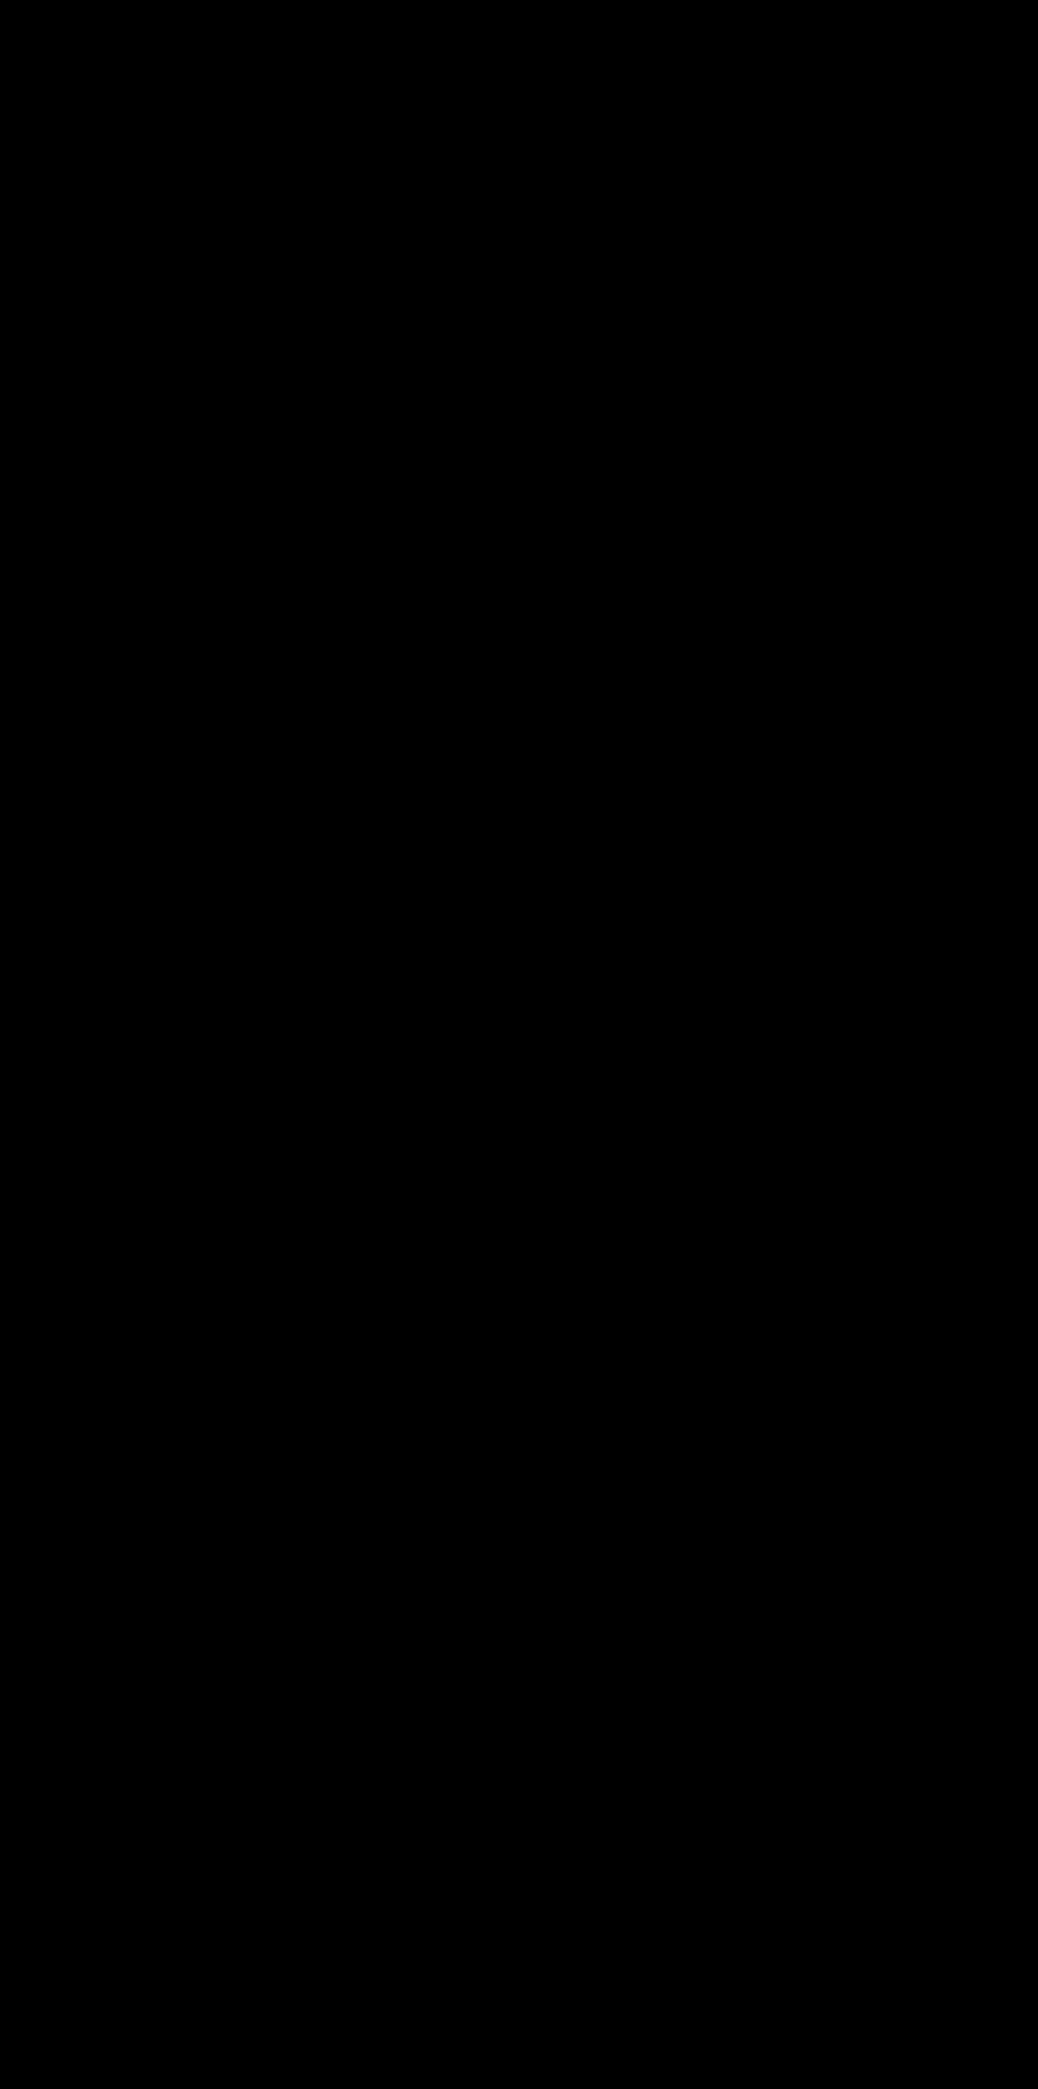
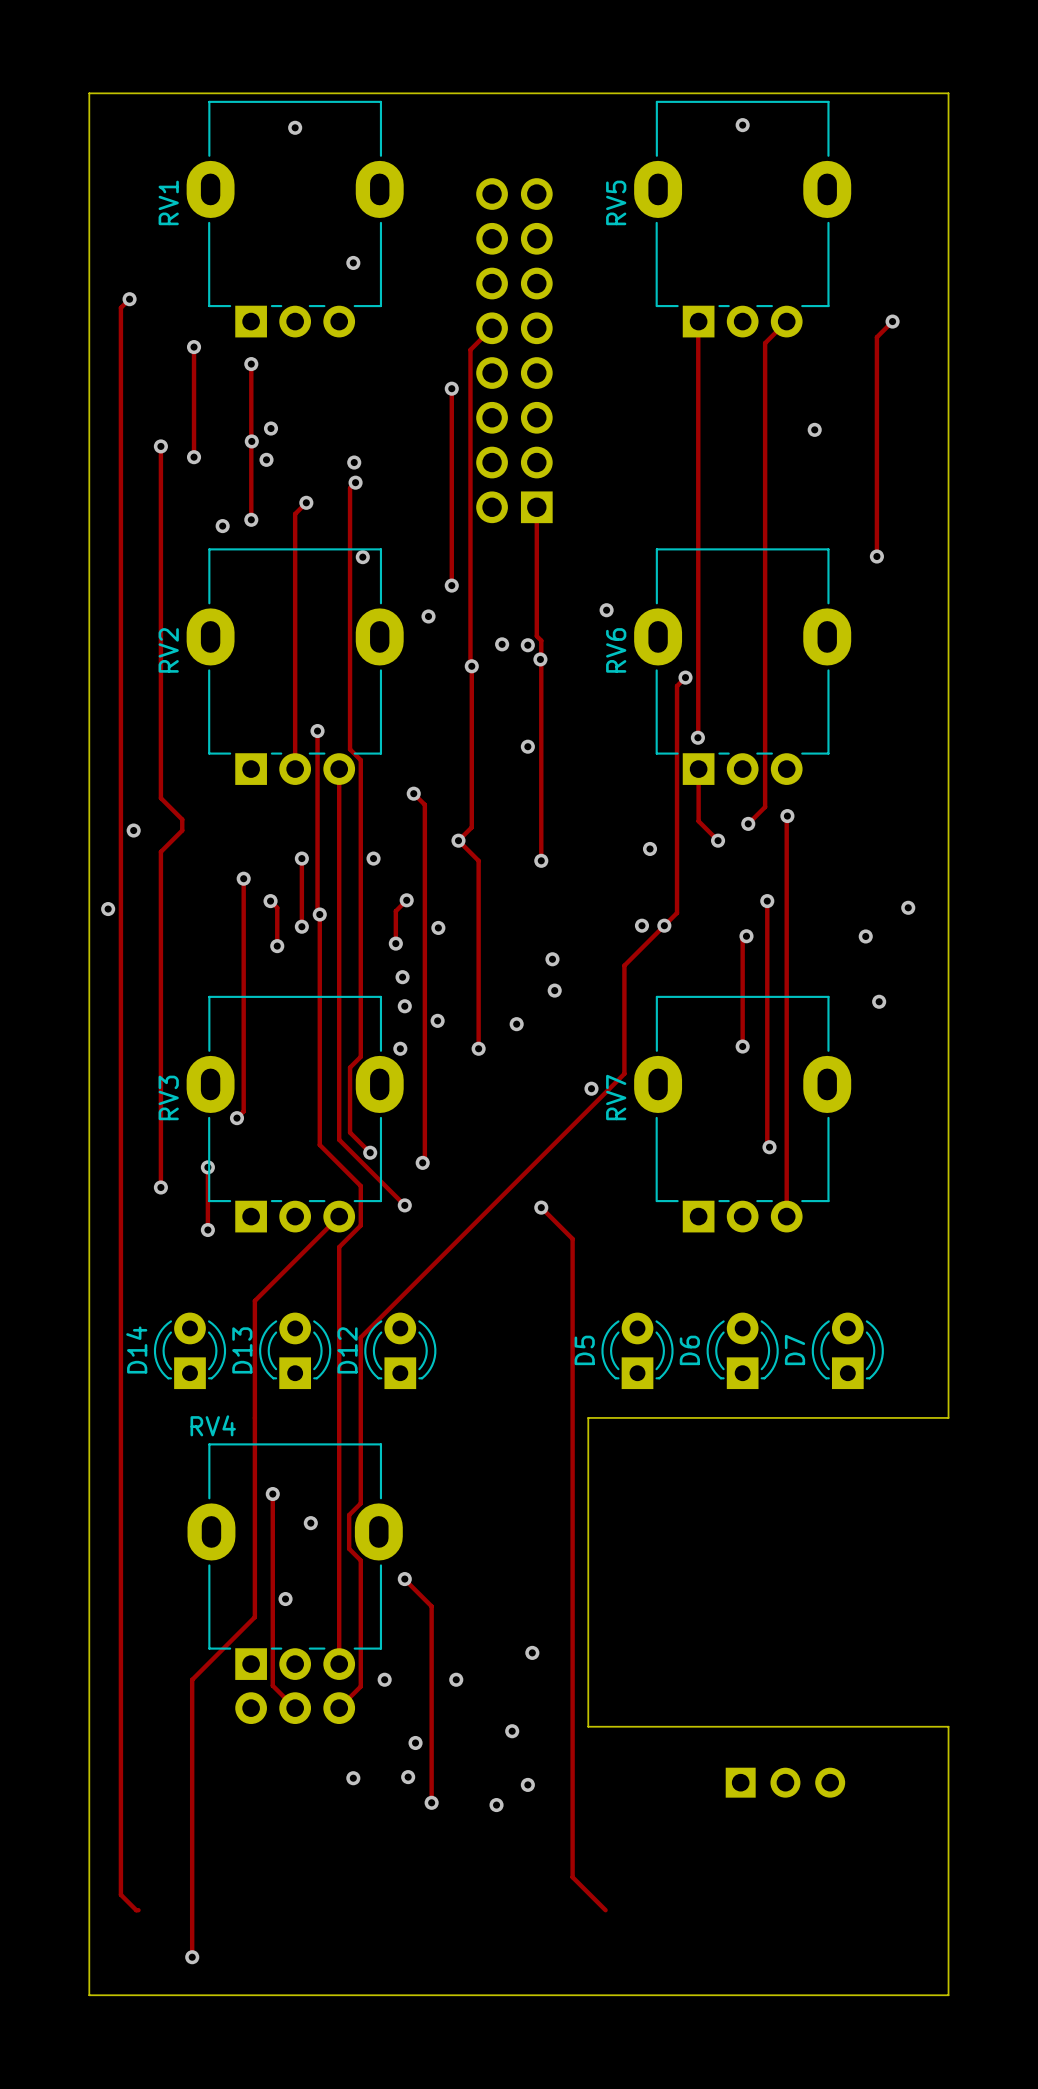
board edge: none -> (89, 93) (89, 1995) (948, 1995) (948, 1726) (588, 1726) (588, 1417) (948, 1417) (948, 93) (89, 93)
via: none -> (742, 125)
via: none -> (295, 127)
RV1: none -> (295, 219)
RV5: none -> (742, 219)
via: none -> (353, 262)
track: none -> (129, 299) (120, 307) (120, 1894) (138, 1910)
via: none -> (129, 299)
track: none -> (698, 321) (697, 737)
track: none -> (786, 321) (765, 343) (765, 807) (748, 823)
track: none -> (892, 321) (876, 337) (876, 556)
via: none -> (892, 321)
track: none -> (492, 328) (470, 349) (471, 827) (458, 840) (478, 860) (478, 1048)
track: none -> (194, 347) (194, 457)
via: none -> (194, 347)
part: none -> (514, 350)
track: none -> (251, 364) (251, 519)
via: none -> (251, 364)
track: none -> (451, 388) (451, 585)
via: none -> (451, 388)
via: none -> (270, 428)
via: none -> (814, 429)
via: none -> (251, 441)
track: none -> (160, 446) (160, 798) (182, 819) (182, 830) (160, 851) (160, 1187)
via: none -> (160, 446)
via: none -> (194, 457)
via: none -> (266, 459)
via: none -> (354, 462)
track: none -> (355, 482) (350, 488) (350, 749) (360, 760) (360, 1056) (350, 1067) (350, 1132) (370, 1152)
via: none -> (355, 482)
track: none -> (306, 502) (295, 514) (295, 769)
via: none -> (306, 502)
track: none -> (536, 507) (536, 636) (541, 640) (541, 860)
via: none -> (251, 519)
via: none -> (222, 526)
via: none -> (876, 556)
via: none -> (362, 557)
via: none -> (451, 585)
via: none -> (606, 610)
via: none -> (428, 616)
via: none -> (502, 644)
via: none -> (527, 645)
via: none -> (540, 659)
RV2: none -> (295, 666)
via: none -> (471, 666)
RV6: none -> (742, 666)
track: none -> (685, 677) (677, 686) (677, 913) (624, 965) (624, 1073) (360, 1337) (360, 1503) (349, 1515) (349, 1548) (360, 1560) (360, 1686) (339, 1708)
via: none -> (685, 677)
track: none -> (317, 731) (319, 1144) (360, 1186) (360, 1225) (339, 1247) (339, 1664)
via: none -> (317, 731)
via: none -> (697, 737)
via: none -> (527, 746)
track: none -> (339, 769) (339, 1139) (404, 1205)
track: none -> (698, 769) (698, 821) (718, 840)
track: none -> (413, 793) (424, 804) (424, 1160) (422, 1162)
via: none -> (413, 793)
track: none -> (787, 816) (786, 1216)
via: none -> (787, 816)
via: none -> (748, 823)
via: none -> (133, 830)
via: none -> (458, 840)
via: none -> (718, 840)
via: none -> (650, 848)
track: none -> (301, 858) (301, 926)
via: none -> (301, 858)
via: none -> (373, 858)
via: none -> (541, 860)
track: none -> (243, 878) (243, 1111) (236, 1118)
via: none -> (243, 878)
track: none -> (406, 900) (395, 911) (395, 943)
via: none -> (406, 900)
track: none -> (270, 901) (277, 907) (277, 946)
via: none -> (270, 901)
track: none -> (767, 901) (767, 1144) (769, 1147)
via: none -> (767, 901)
via: none -> (908, 907)
via: none -> (108, 909)
via: none -> (319, 914)
via: none -> (641, 925)
via: none -> (664, 925)
via: none -> (301, 926)
via: none -> (438, 927)
track: none -> (746, 936) (742, 940) (742, 1046)
via: none -> (746, 936)
via: none -> (865, 936)
via: none -> (395, 943)
via: none -> (277, 946)
via: none -> (552, 959)
via: none -> (402, 977)
via: none -> (554, 990)
via: none -> (879, 1001)
via: none -> (404, 1006)
via: none -> (437, 1020)
via: none -> (516, 1024)
via: none -> (742, 1046)
via: none -> (400, 1048)
via: none -> (478, 1048)
via: none -> (591, 1088)
RV3: none -> (295, 1114)
RV7: none -> (742, 1114)
via: none -> (236, 1118)
via: none -> (769, 1147)
via: none -> (370, 1152)
via: none -> (422, 1162)
track: none -> (207, 1167) (207, 1230)
via: none -> (207, 1167)
via: none -> (160, 1187)
via: none -> (404, 1205)
track: none -> (541, 1207) (572, 1238) (572, 1877) (605, 1910)
via: none -> (541, 1207)
track: none -> (339, 1216) (254, 1300) (254, 1617) (192, 1679) (192, 1957)
via: none -> (207, 1230)
D14: none -> (189, 1350)
D13: none -> (295, 1350)
D12: none -> (400, 1350)
D5: none -> (637, 1350)
D6: none -> (742, 1350)
D7: none -> (847, 1350)
track: none -> (272, 1494) (272, 1685) (295, 1708)
via: none -> (272, 1494)
via: none -> (310, 1523)
track: none -> (404, 1579) (431, 1606) (431, 1802)
via: none -> (404, 1579)
RV4: none -> (295, 1583)
via: none -> (285, 1599)
via: none -> (532, 1652)
via: none -> (384, 1679)
via: none -> (456, 1679)
via: none -> (512, 1731)
via: none -> (415, 1742)
via: none -> (408, 1777)
via: none -> (353, 1778)
part: none -> (785, 1782)
via: none -> (527, 1784)
via: none -> (431, 1802)
via: none -> (496, 1805)
via: none -> (192, 1957)

